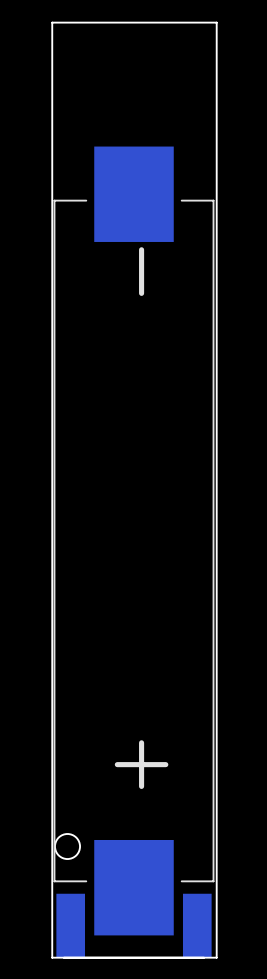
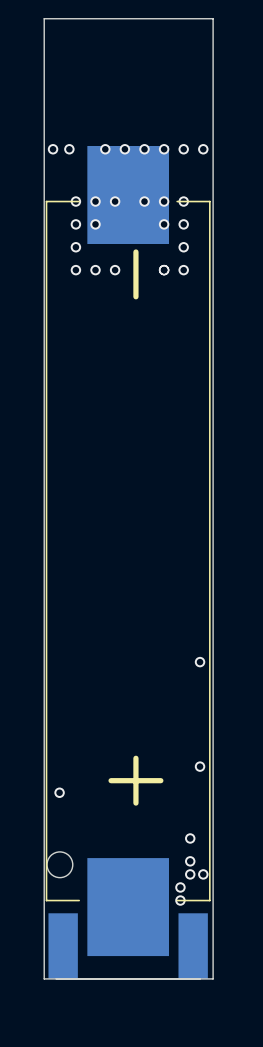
via: none -> (53, 149)
via: none -> (69, 149)
via: none -> (105, 149)
via: none -> (124, 149)
via: none -> (144, 149)
via: none -> (164, 149)
via: none -> (183, 149)
via: none -> (203, 149)
via: none -> (75, 201)
via: none -> (95, 201)
via: none -> (115, 201)
via: none -> (144, 201)
via: none -> (164, 201)
via: none -> (183, 201)
via: none -> (75, 224)
via: none -> (95, 224)
via: none -> (164, 224)
via: none -> (183, 224)
via: none -> (75, 247)
via: none -> (183, 247)
via: none -> (75, 270)
via: none -> (95, 270)
via: none -> (115, 270)
via: none -> (164, 270)
via: none -> (183, 270)
via: none -> (200, 662)
via: none -> (200, 766)
via: none -> (59, 792)
via: none -> (190, 838)
via: none -> (190, 861)
via: none -> (190, 874)
via: none -> (203, 874)
via: none -> (180, 887)
via: none -> (180, 900)

